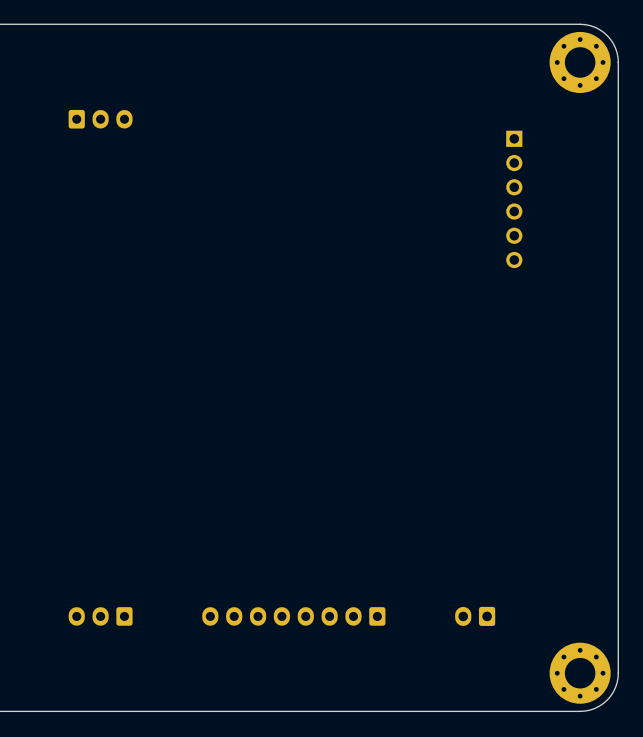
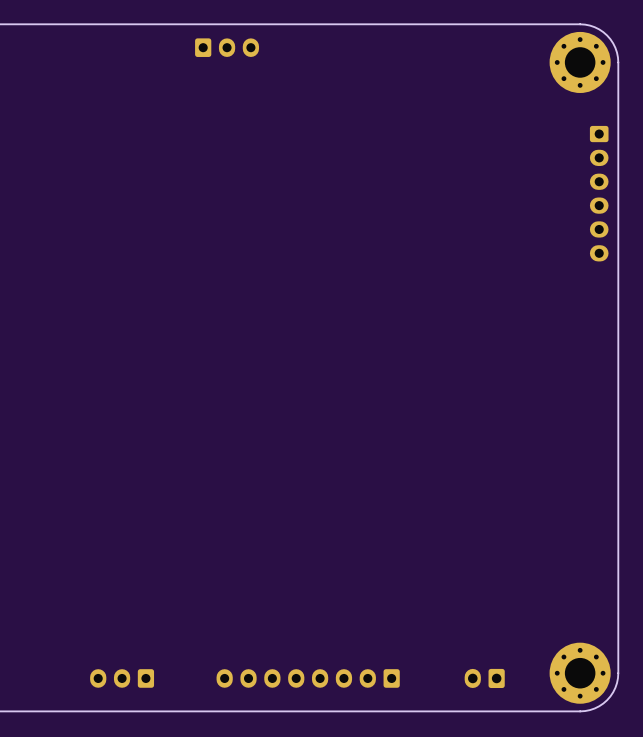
part position: (100, 119) -> (227, 47)
part: none -> (599, 193)
part: (514, 199) -> none
part position: (100, 616) -> (122, 678)
part position: (293, 616) -> (308, 678)
part position: (475, 616) -> (484, 678)

